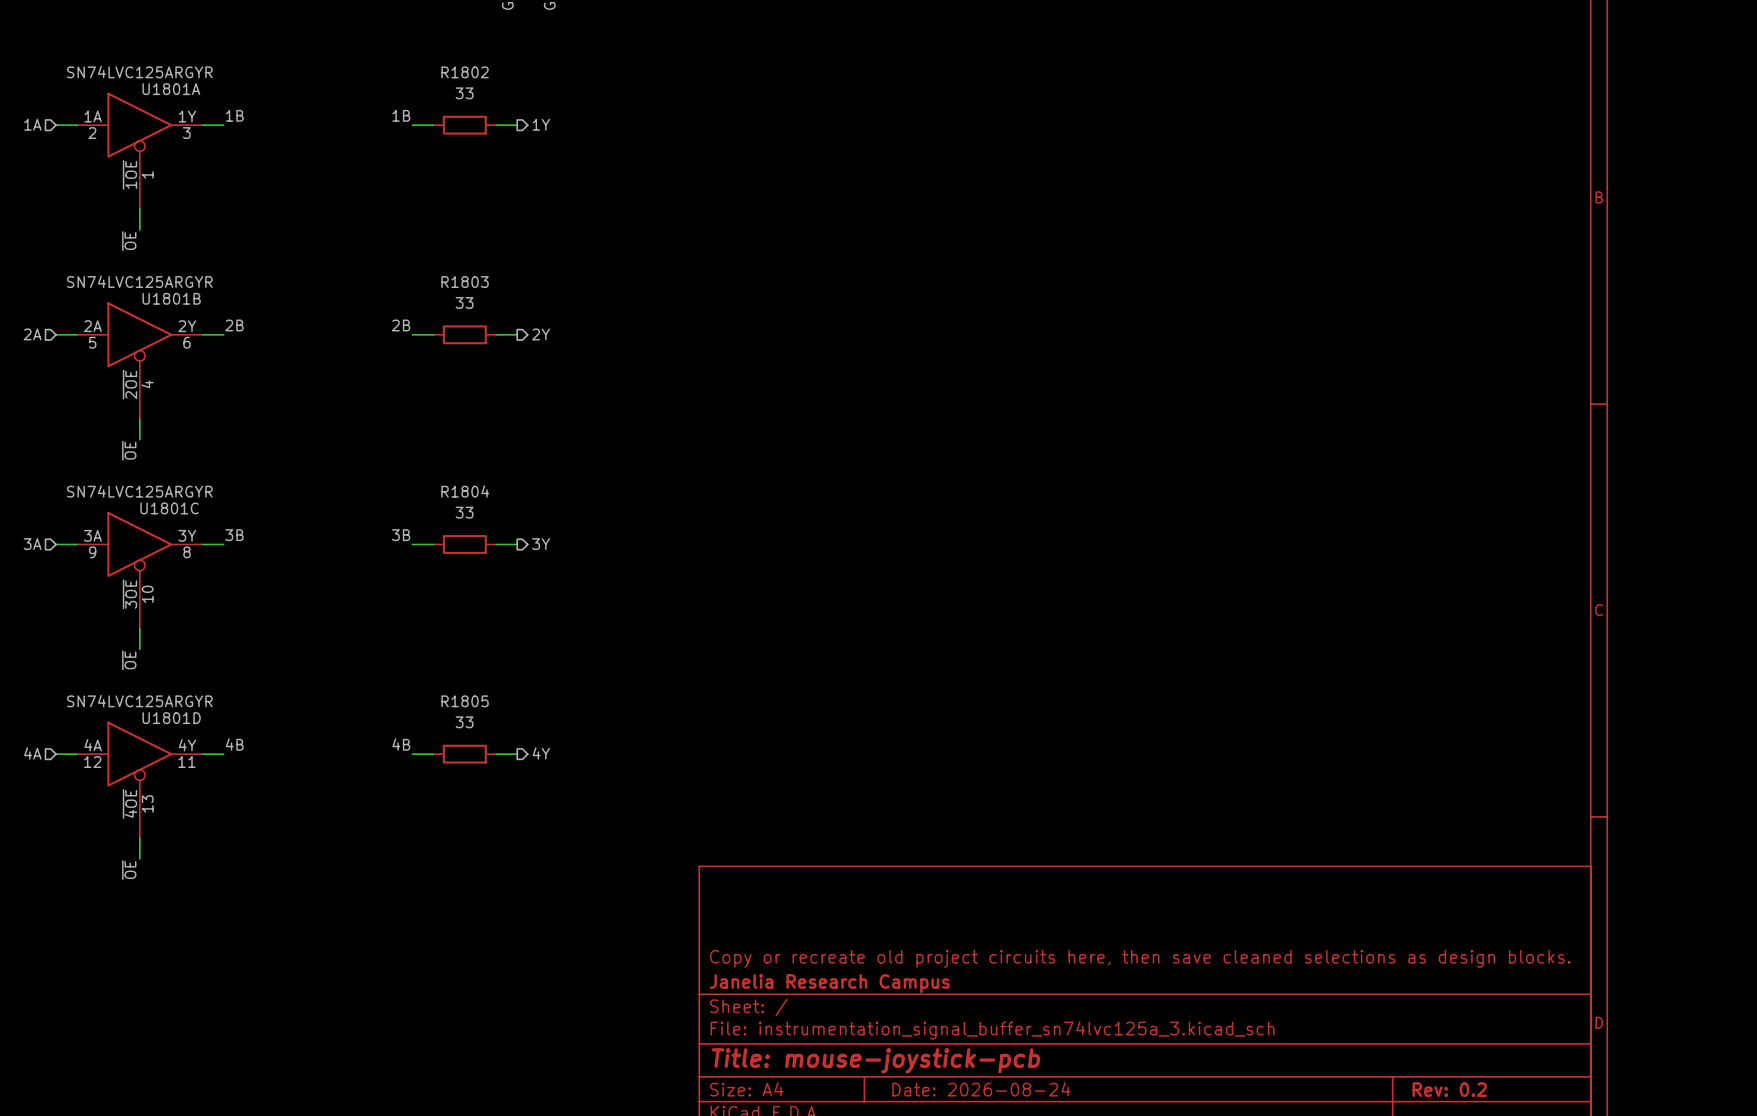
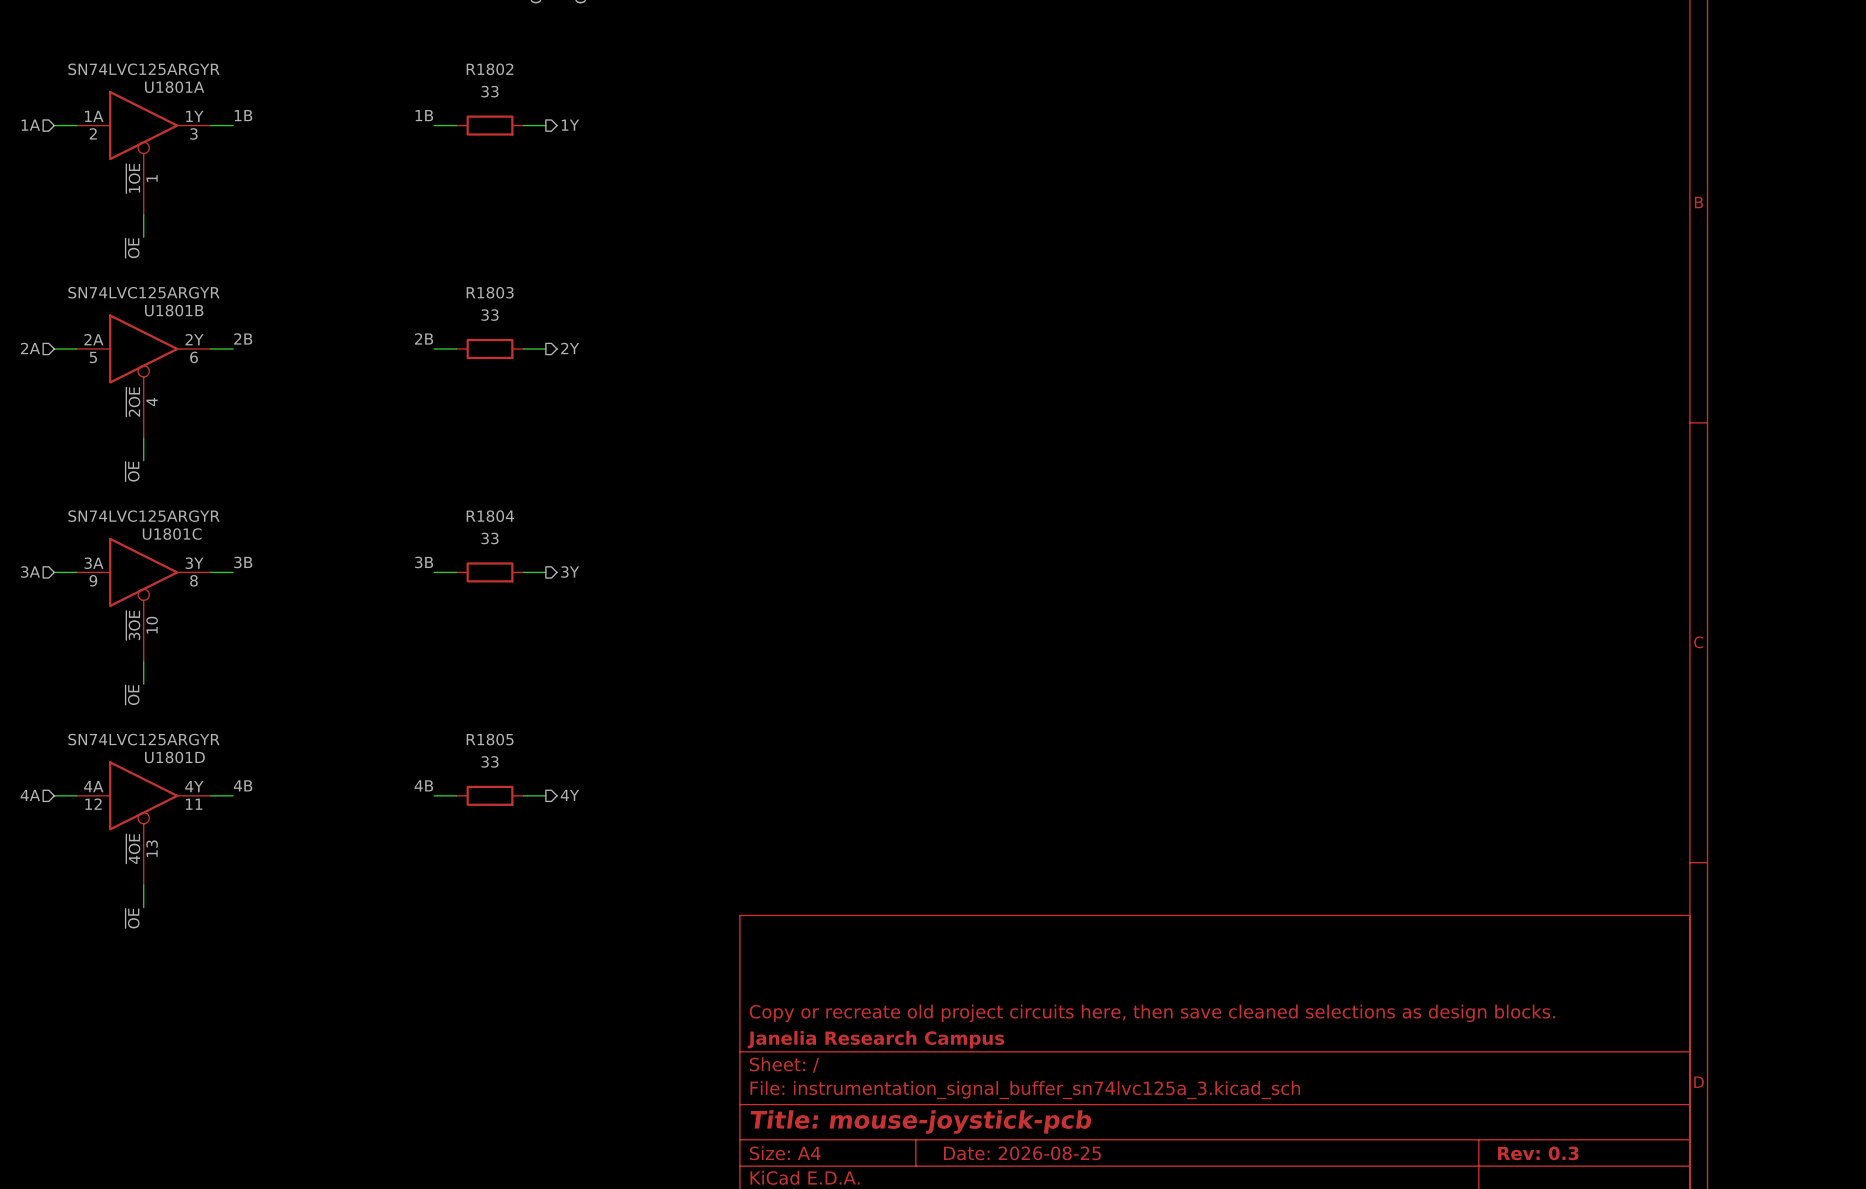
title block: Date: 2026-08-24 (981, 1089) -> Date: 2026-08-25 (1022, 1153)
title block: Rev: 0.2 (1449, 1089) -> Rev: 0.3 (1538, 1153)

